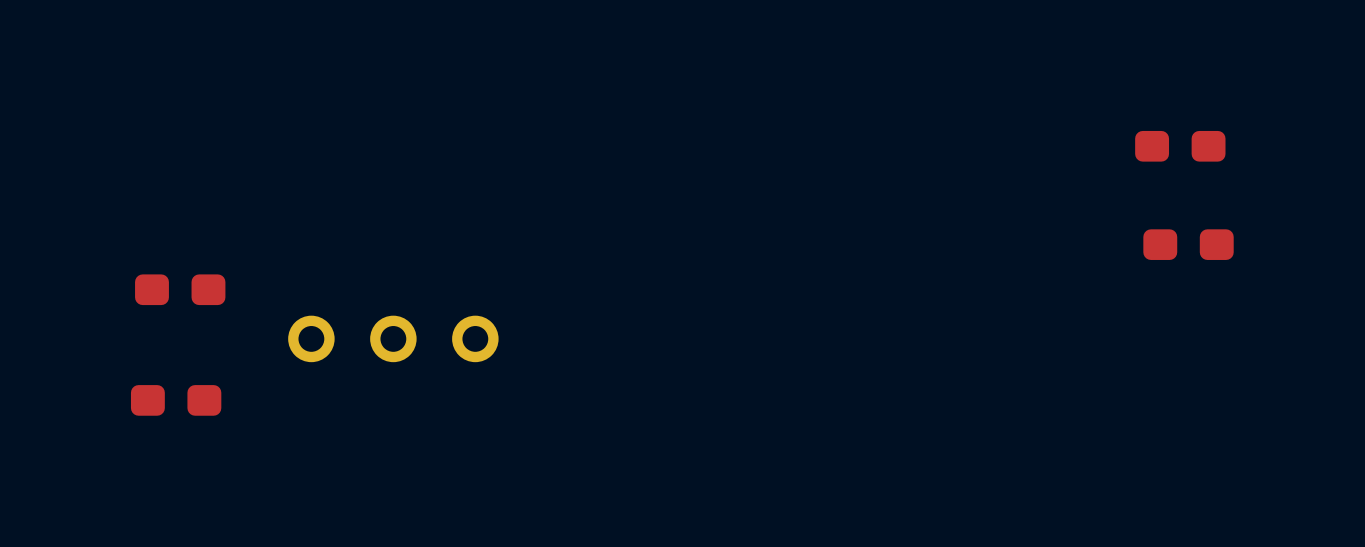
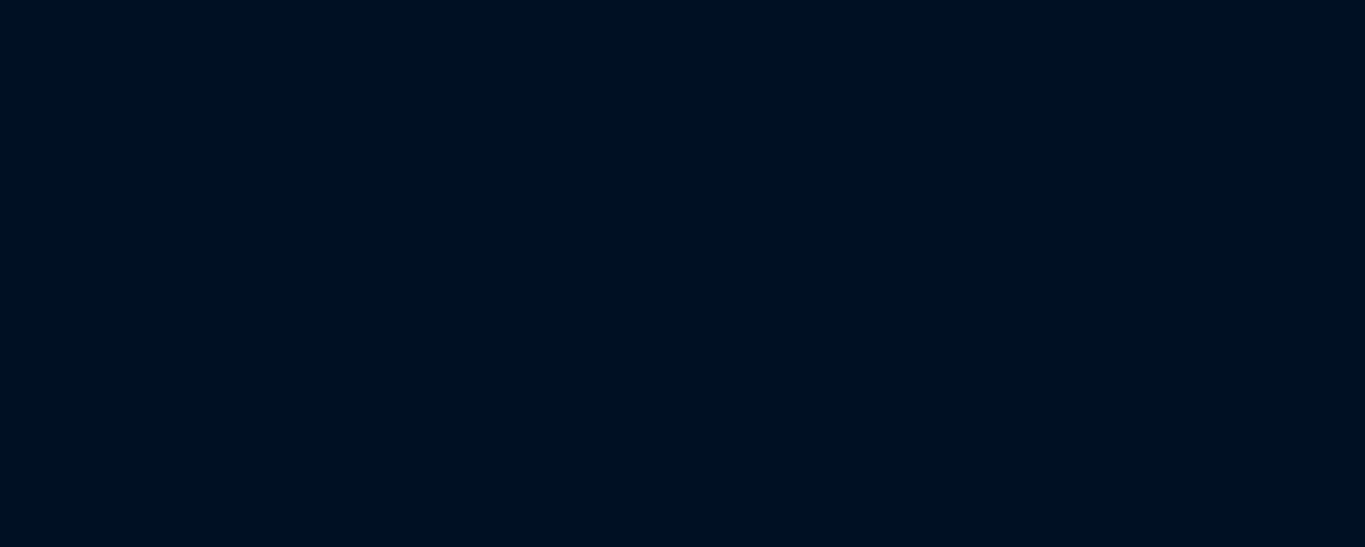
part: (1180, 146) -> none
part: (1188, 244) -> none
part: (180, 289) -> none
part: (393, 338) -> none
part: (176, 400) -> none

